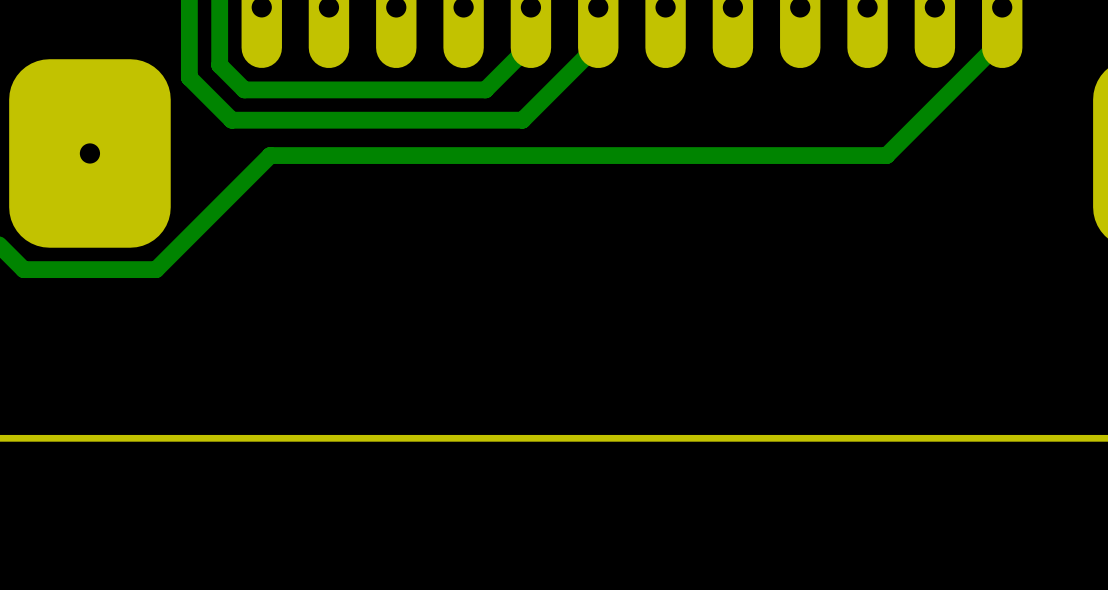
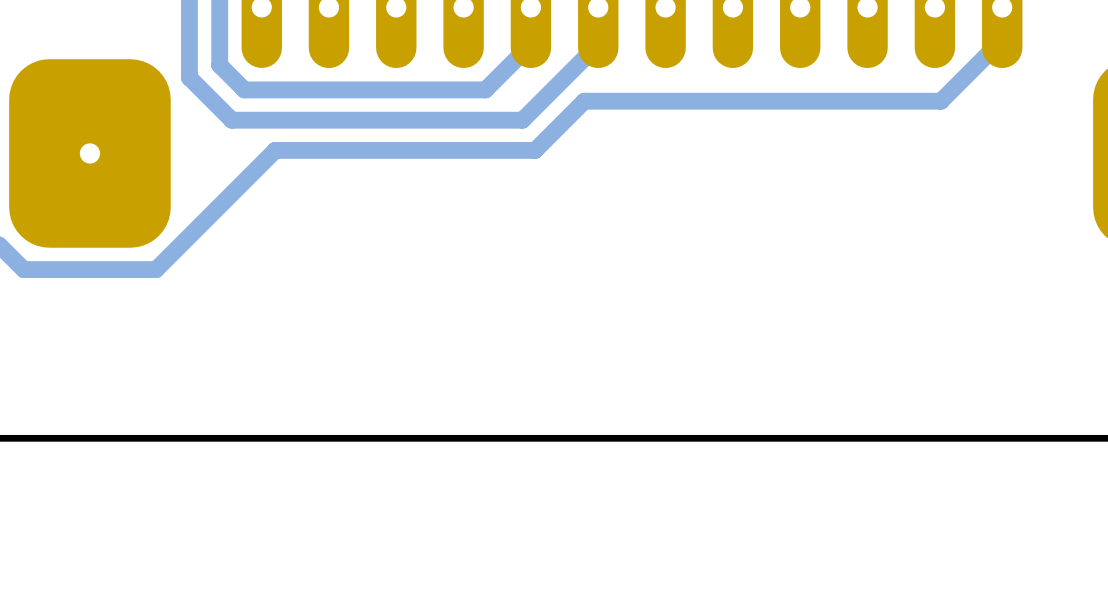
bottom track: (940, 101) (886, 155) (270, 155) -> (940, 101) (584, 101) (535, 150) (275, 150) (270, 155)

